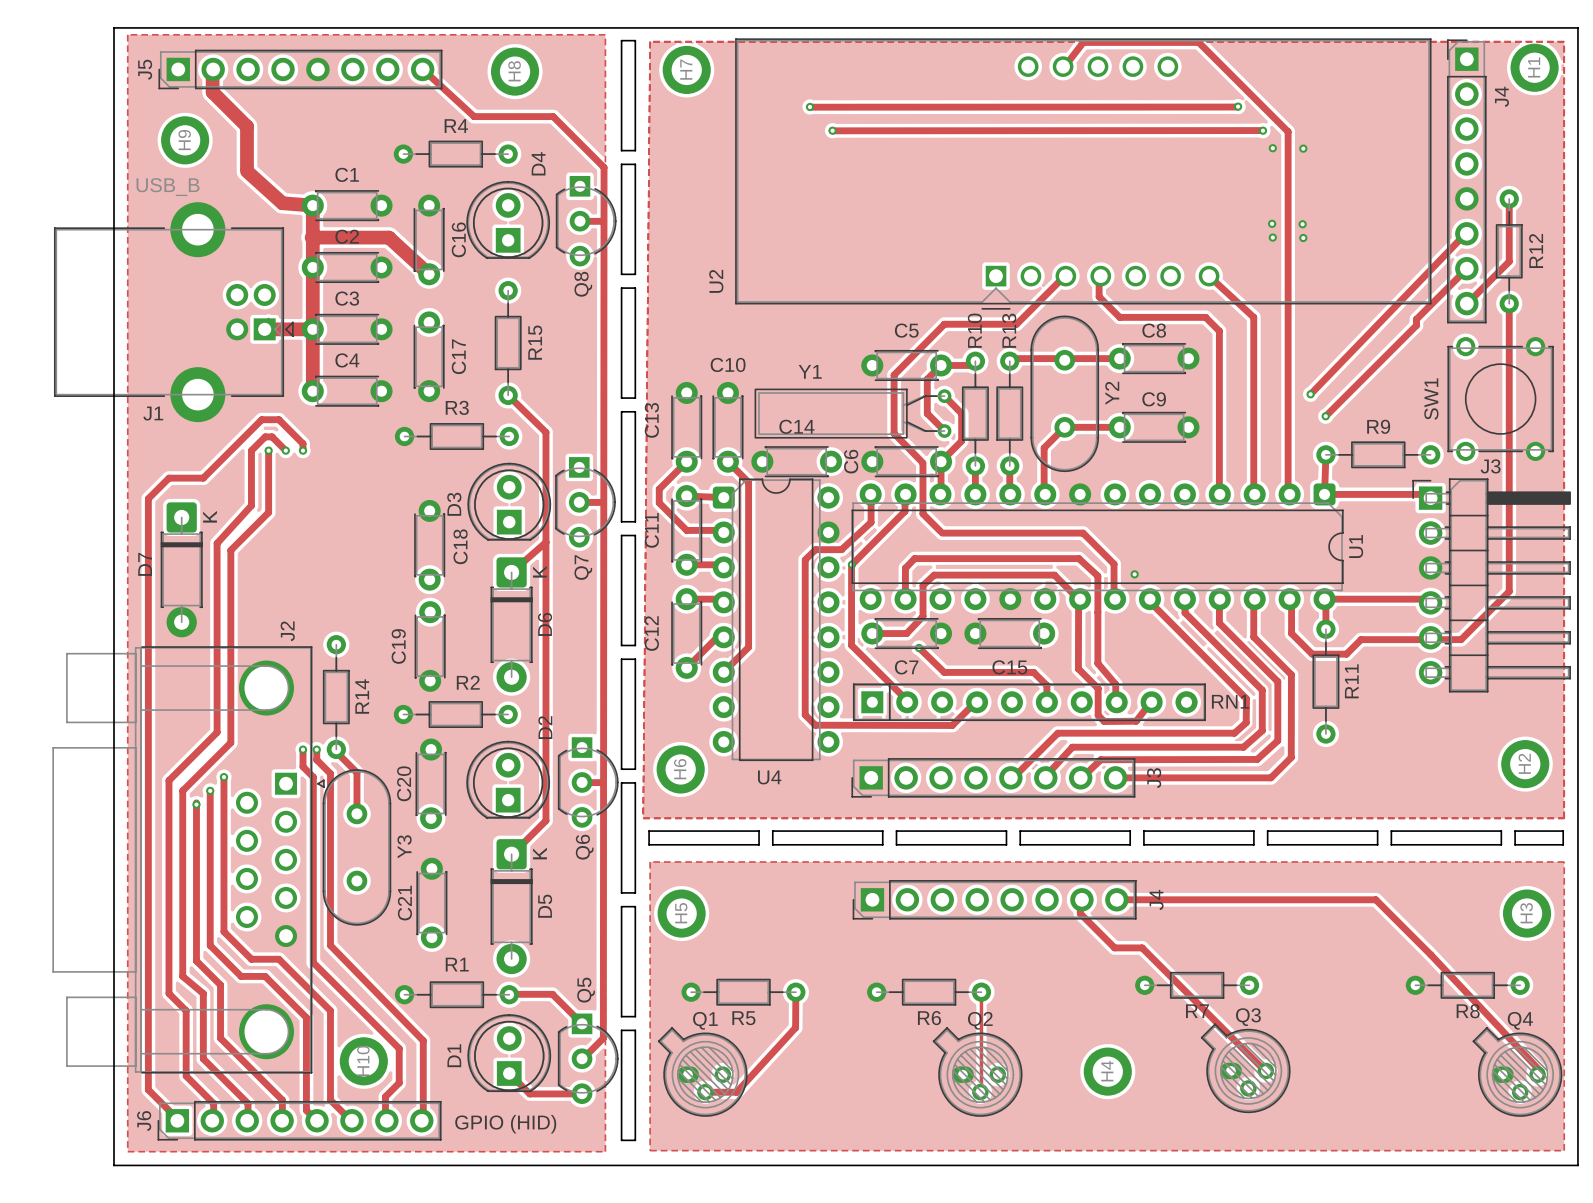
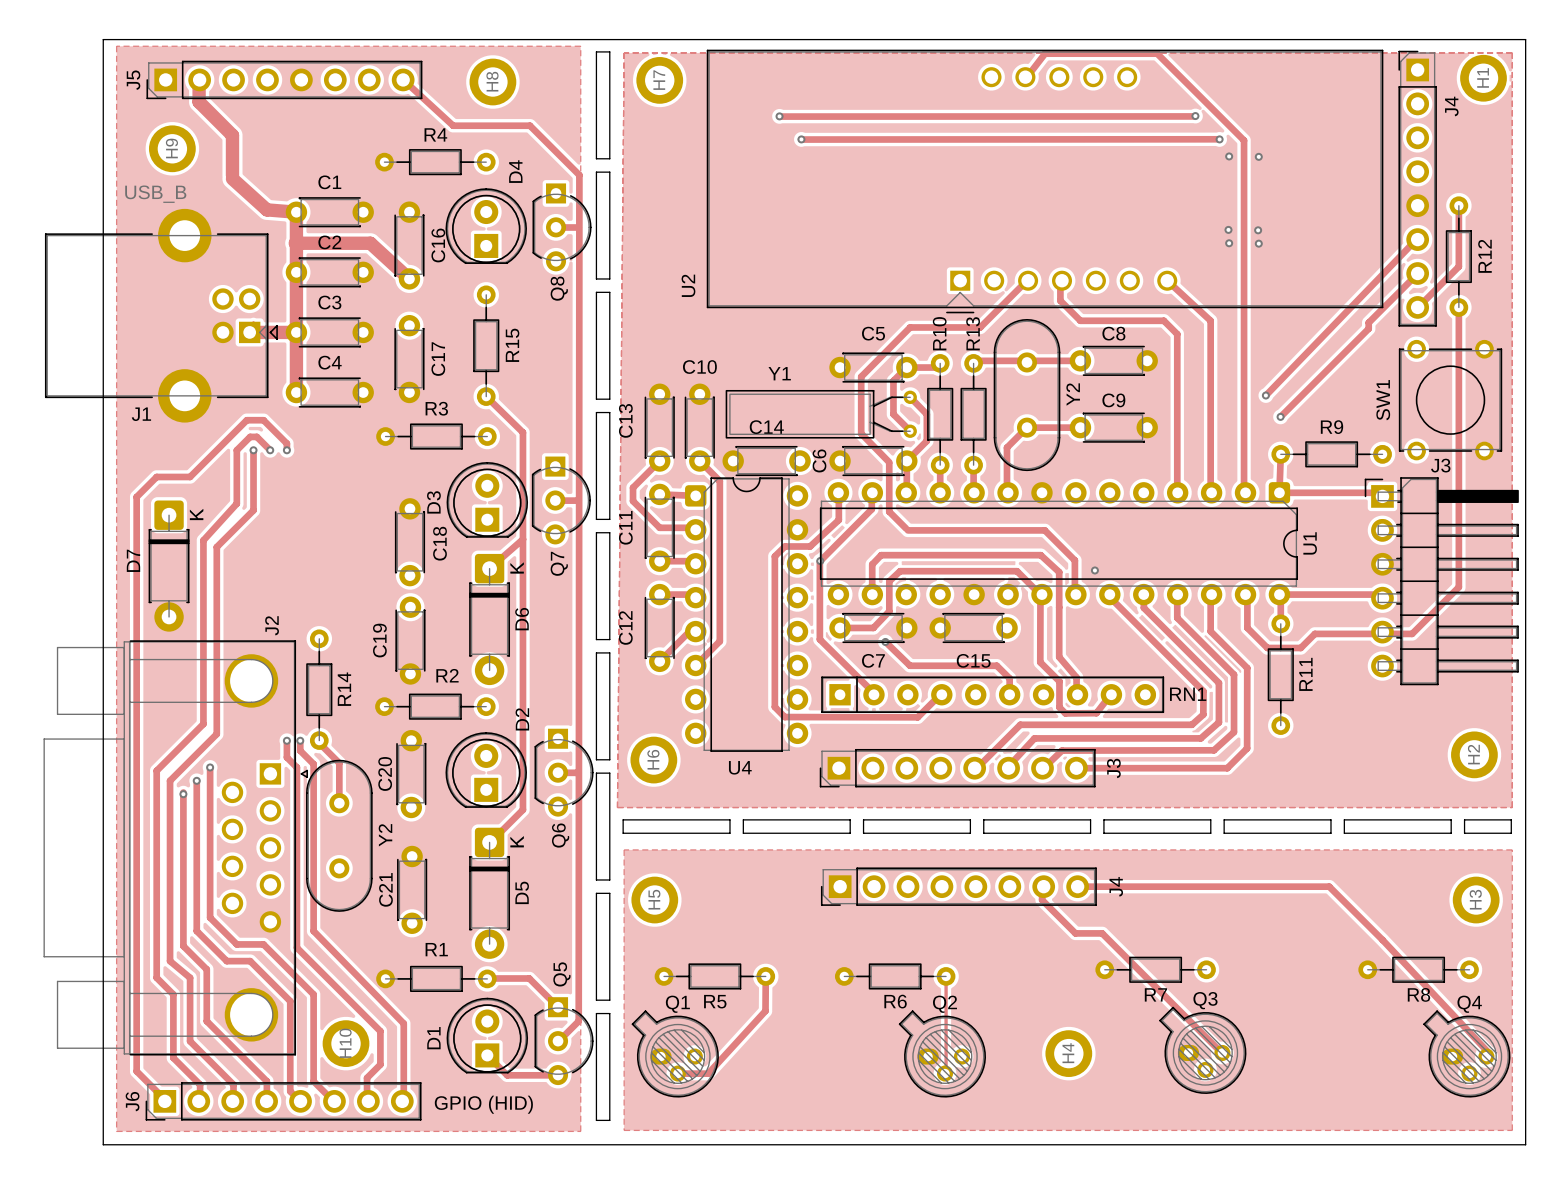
Y3 name: Y3 (404, 846) -> Y2 (385, 835)

